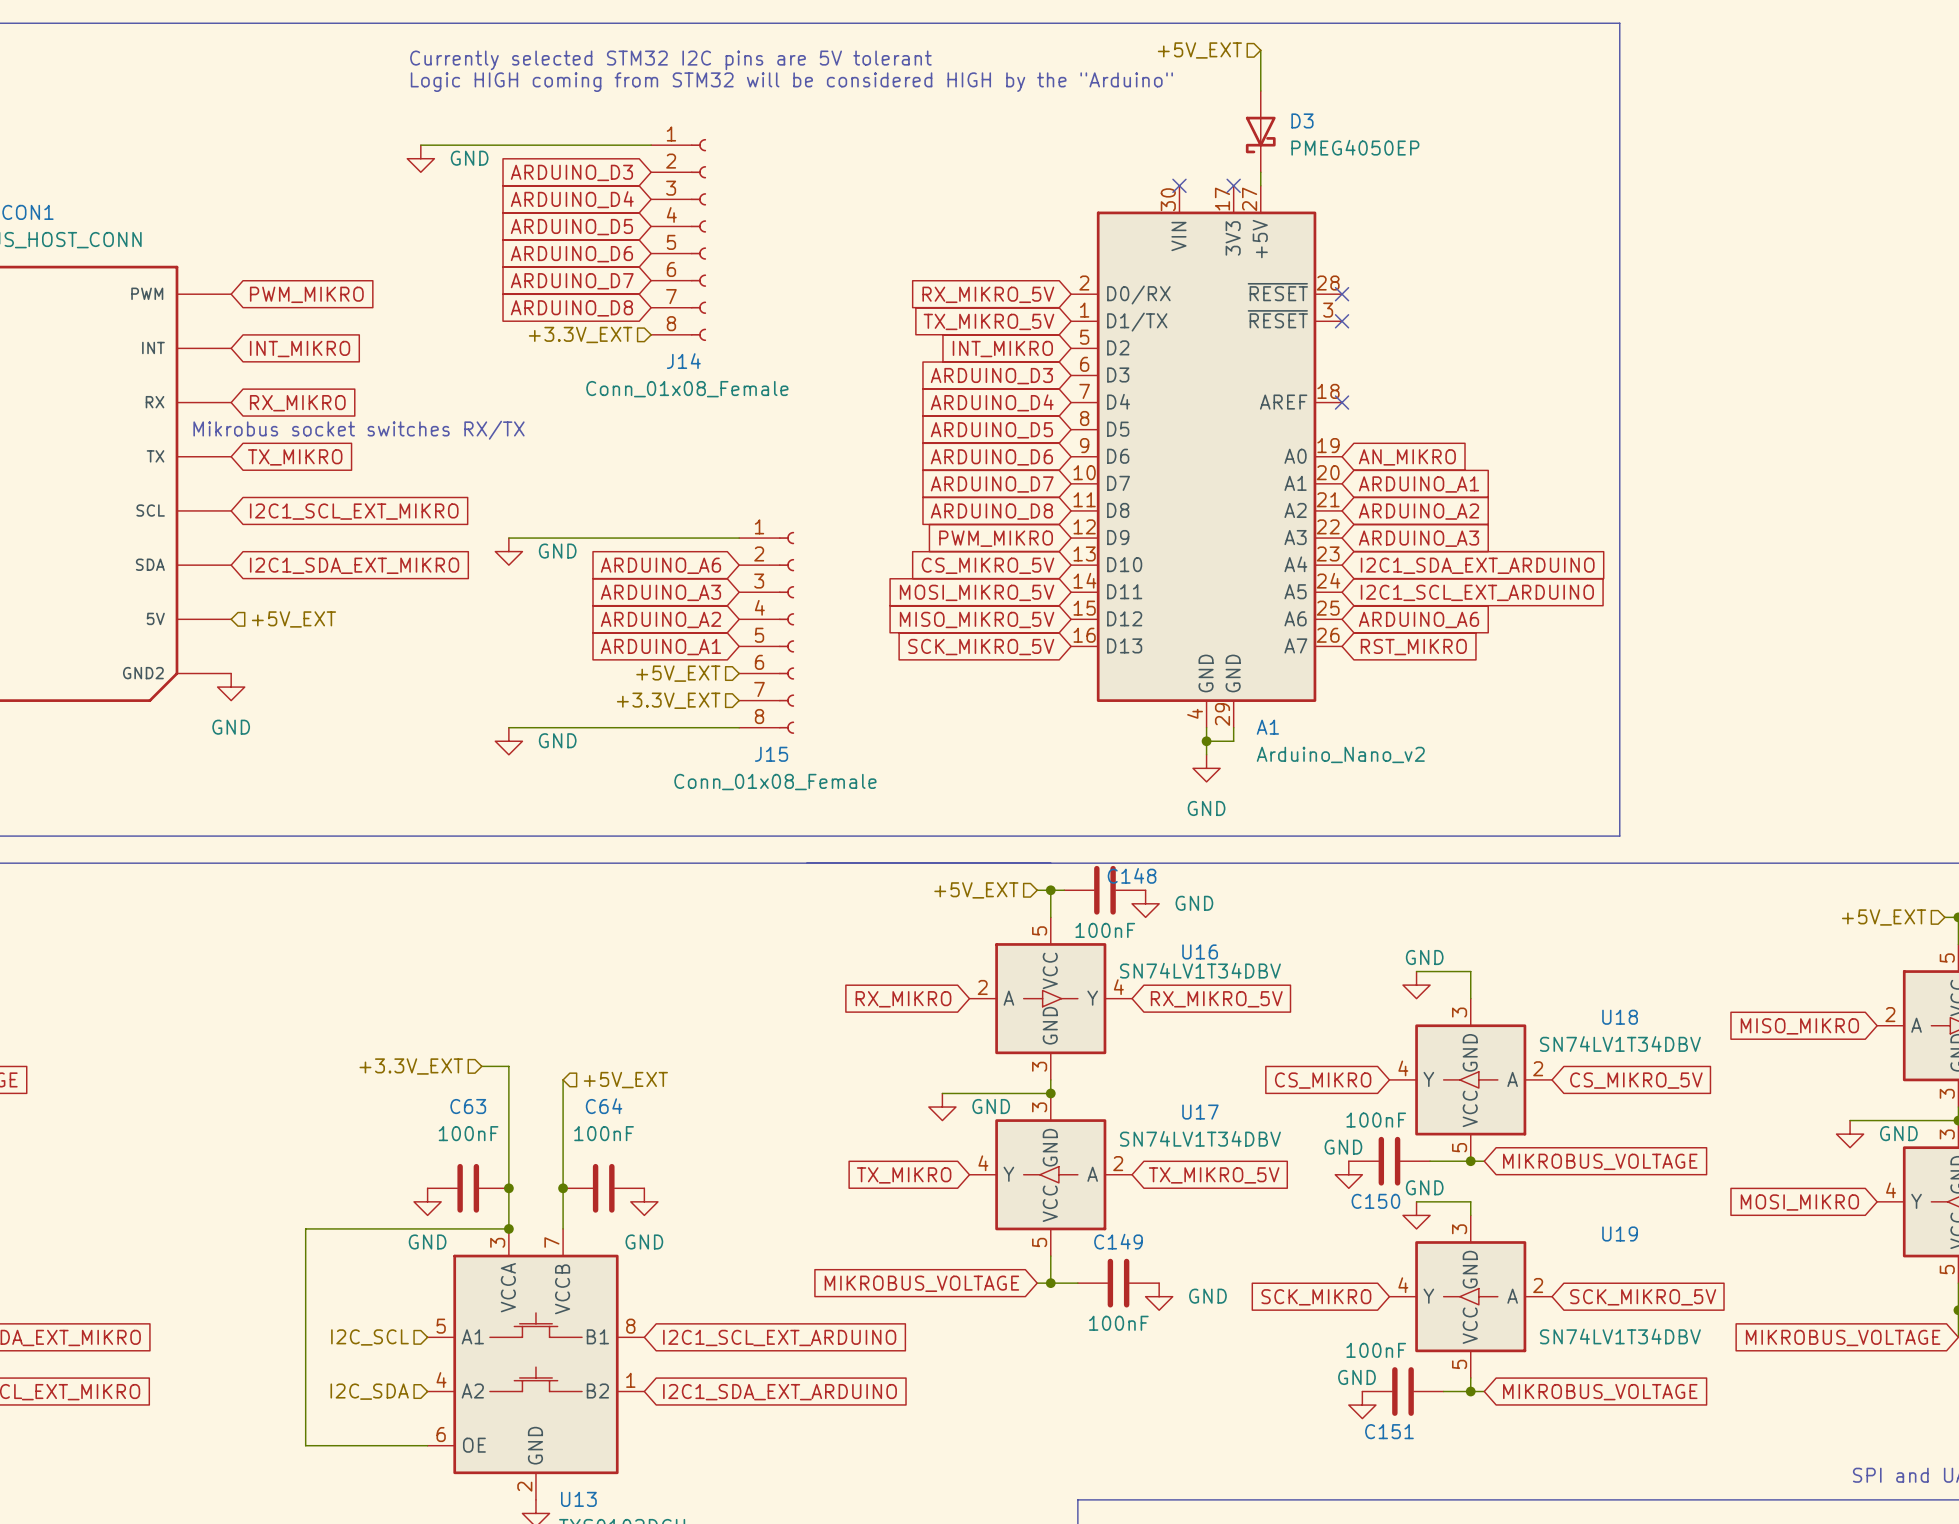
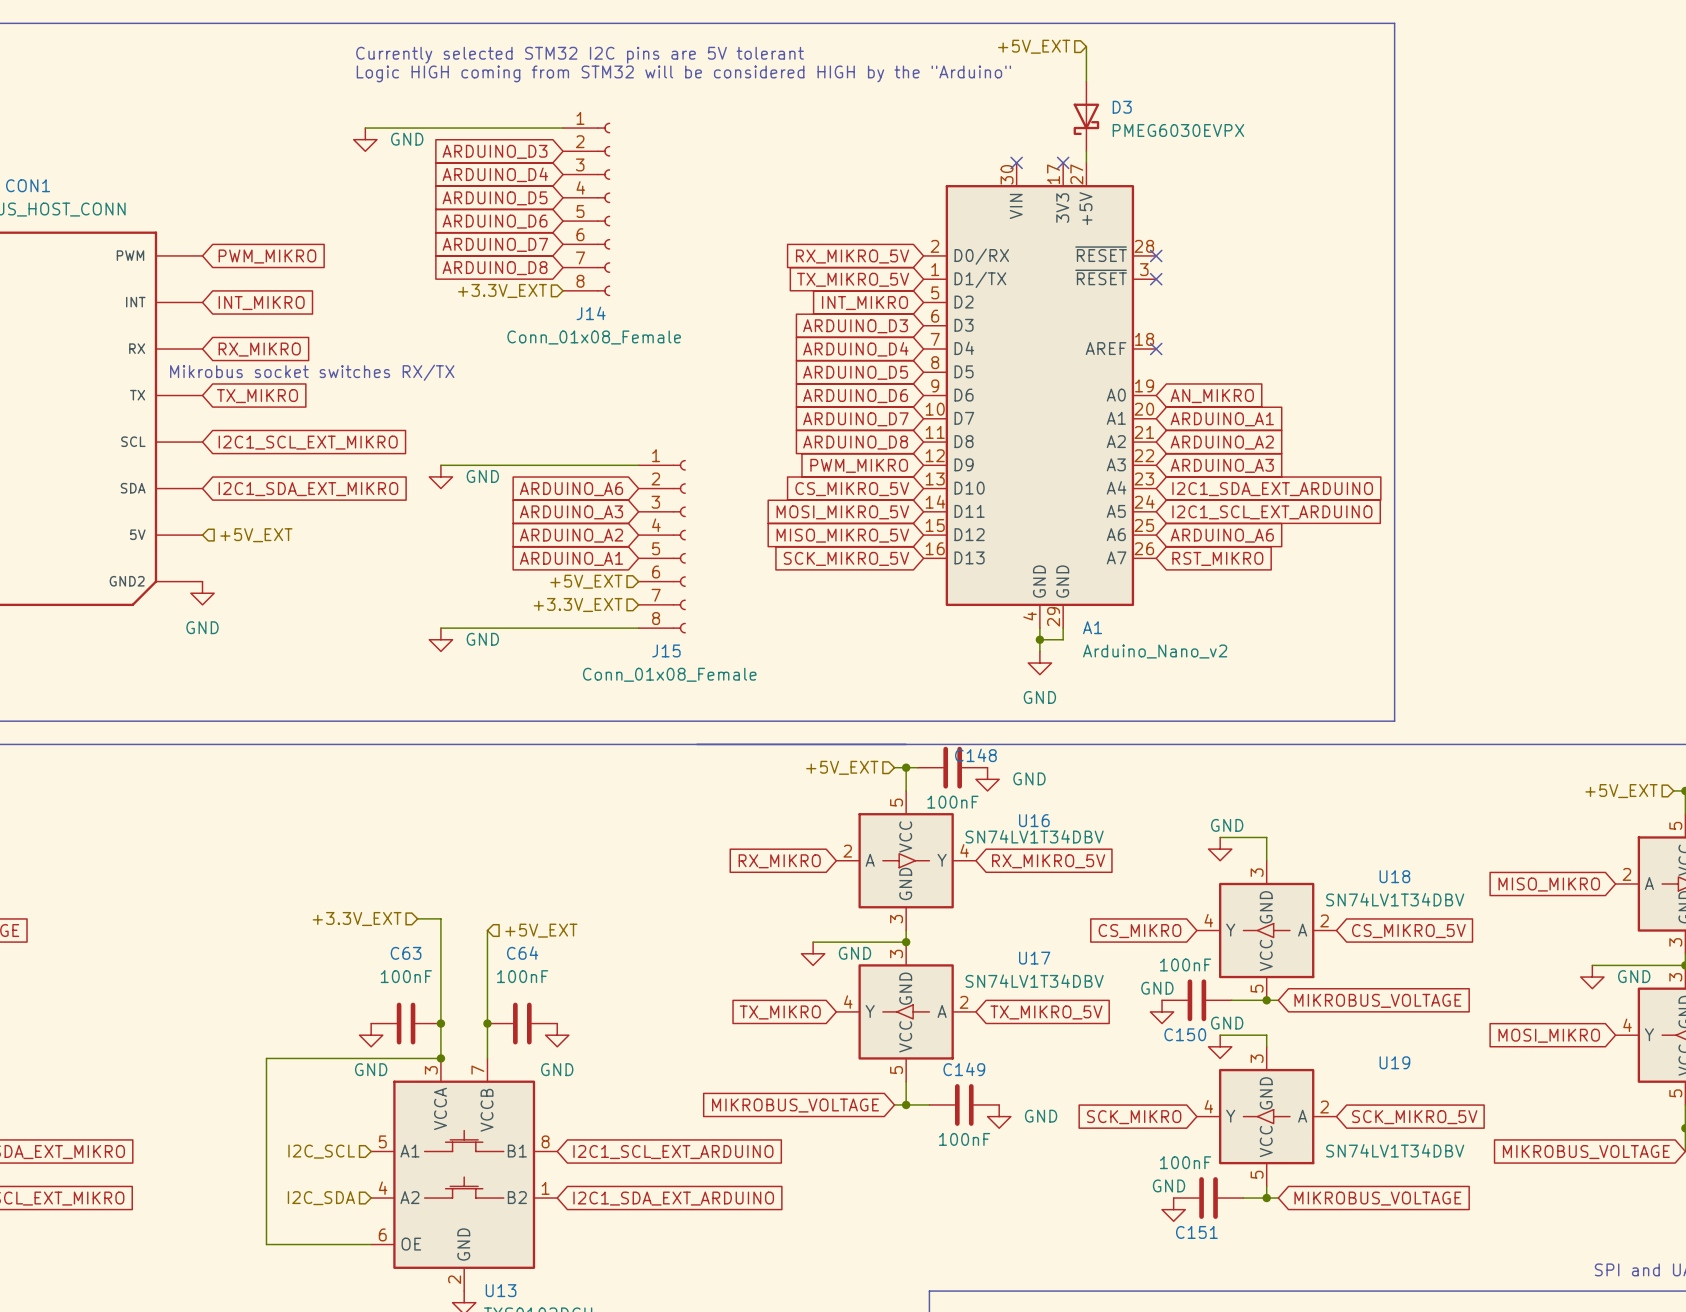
D3 value: PMEG4050EP (1355, 147) -> PMEG6030EVPX (1178, 130)

